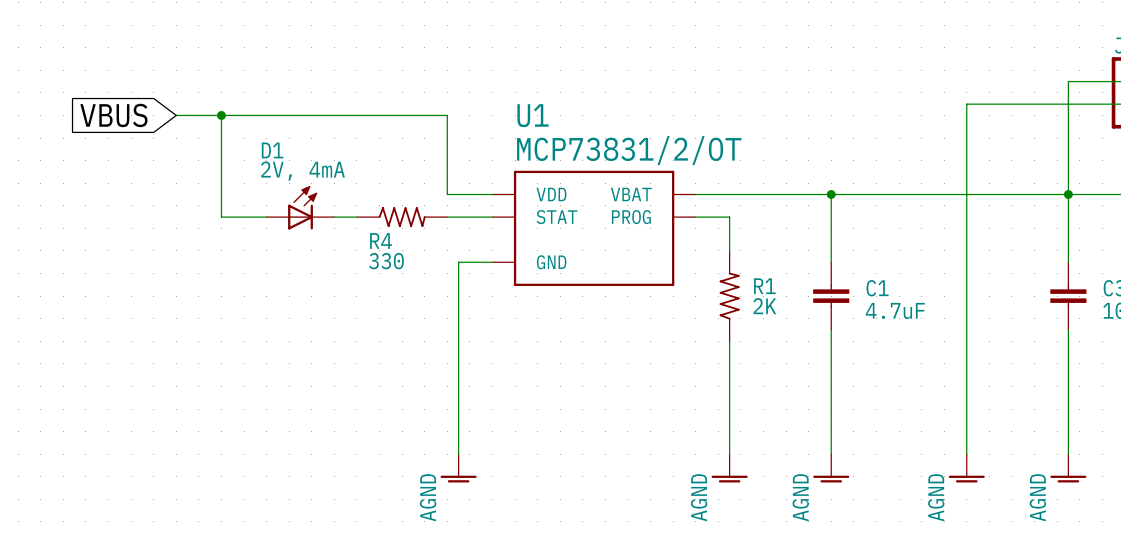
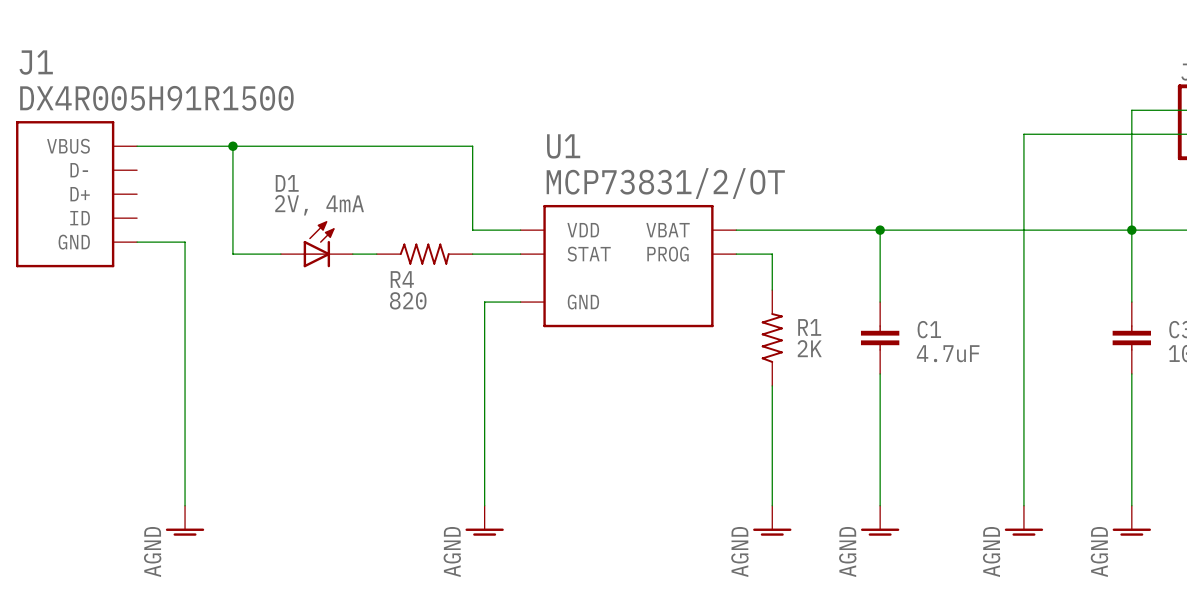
global label: VBUS (113, 115) -> none
wire: none -> (137, 146) (185, 146)
J1: none -> DX4R005H91R1500 (76, 194)
wire: none -> (137, 242) (185, 242) (185, 505)
R4 value: 330 (386, 261) -> 820 (408, 300)
power symbol: none -> AGND (185, 520)

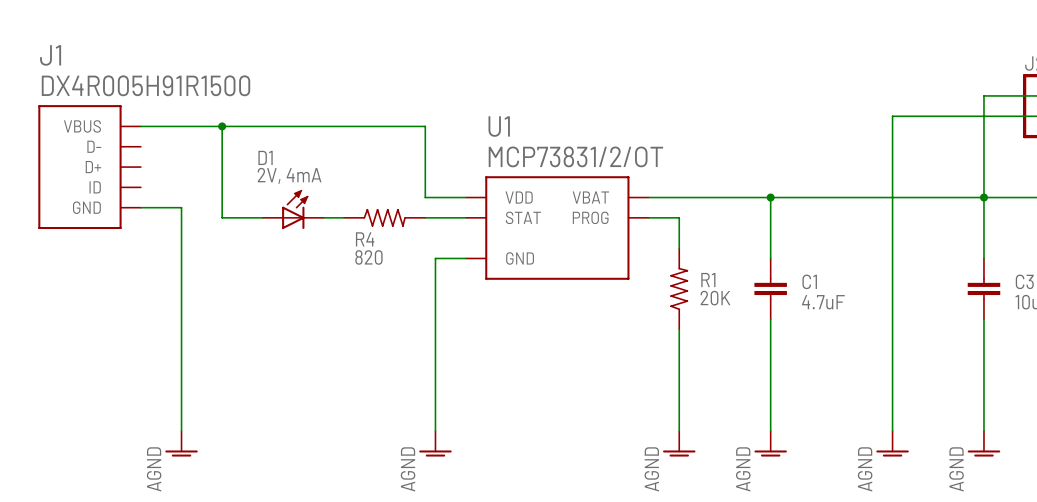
R1 value: 2K (809, 348) -> 20K (715, 298)

